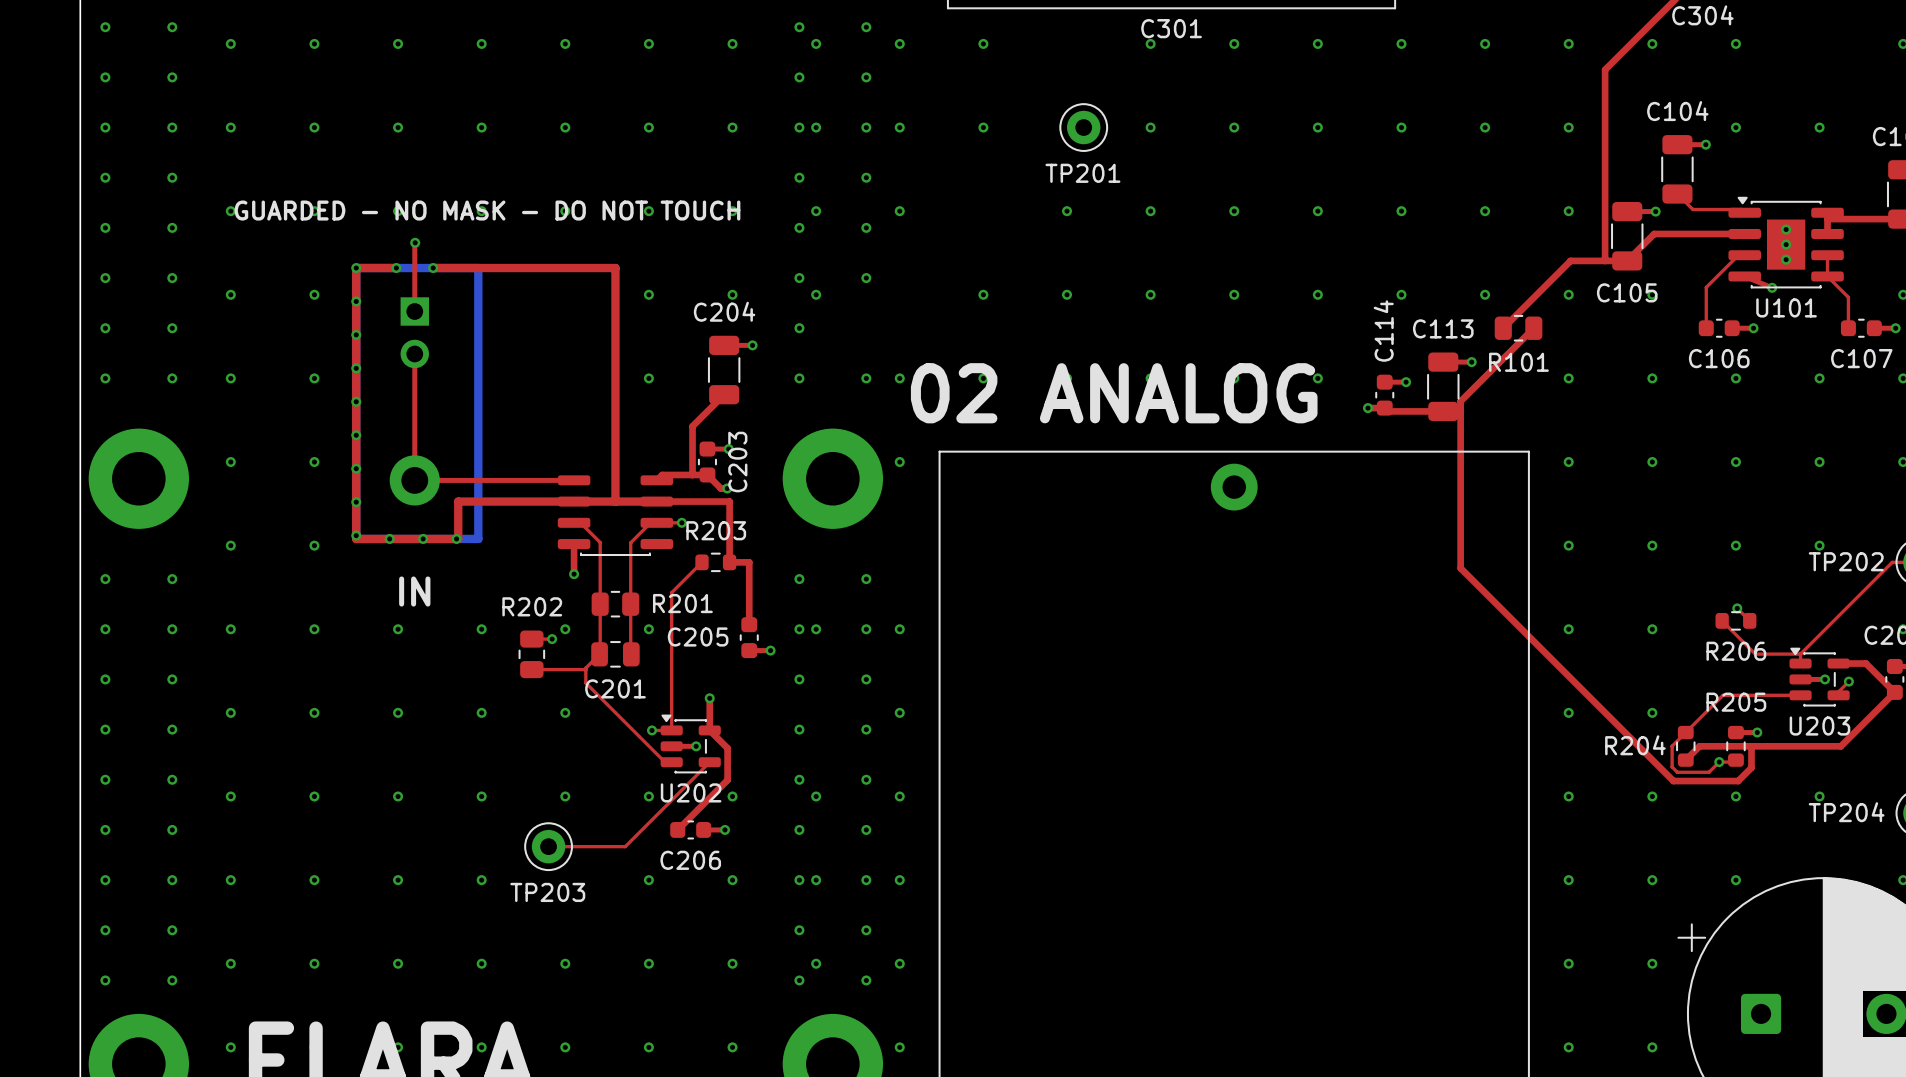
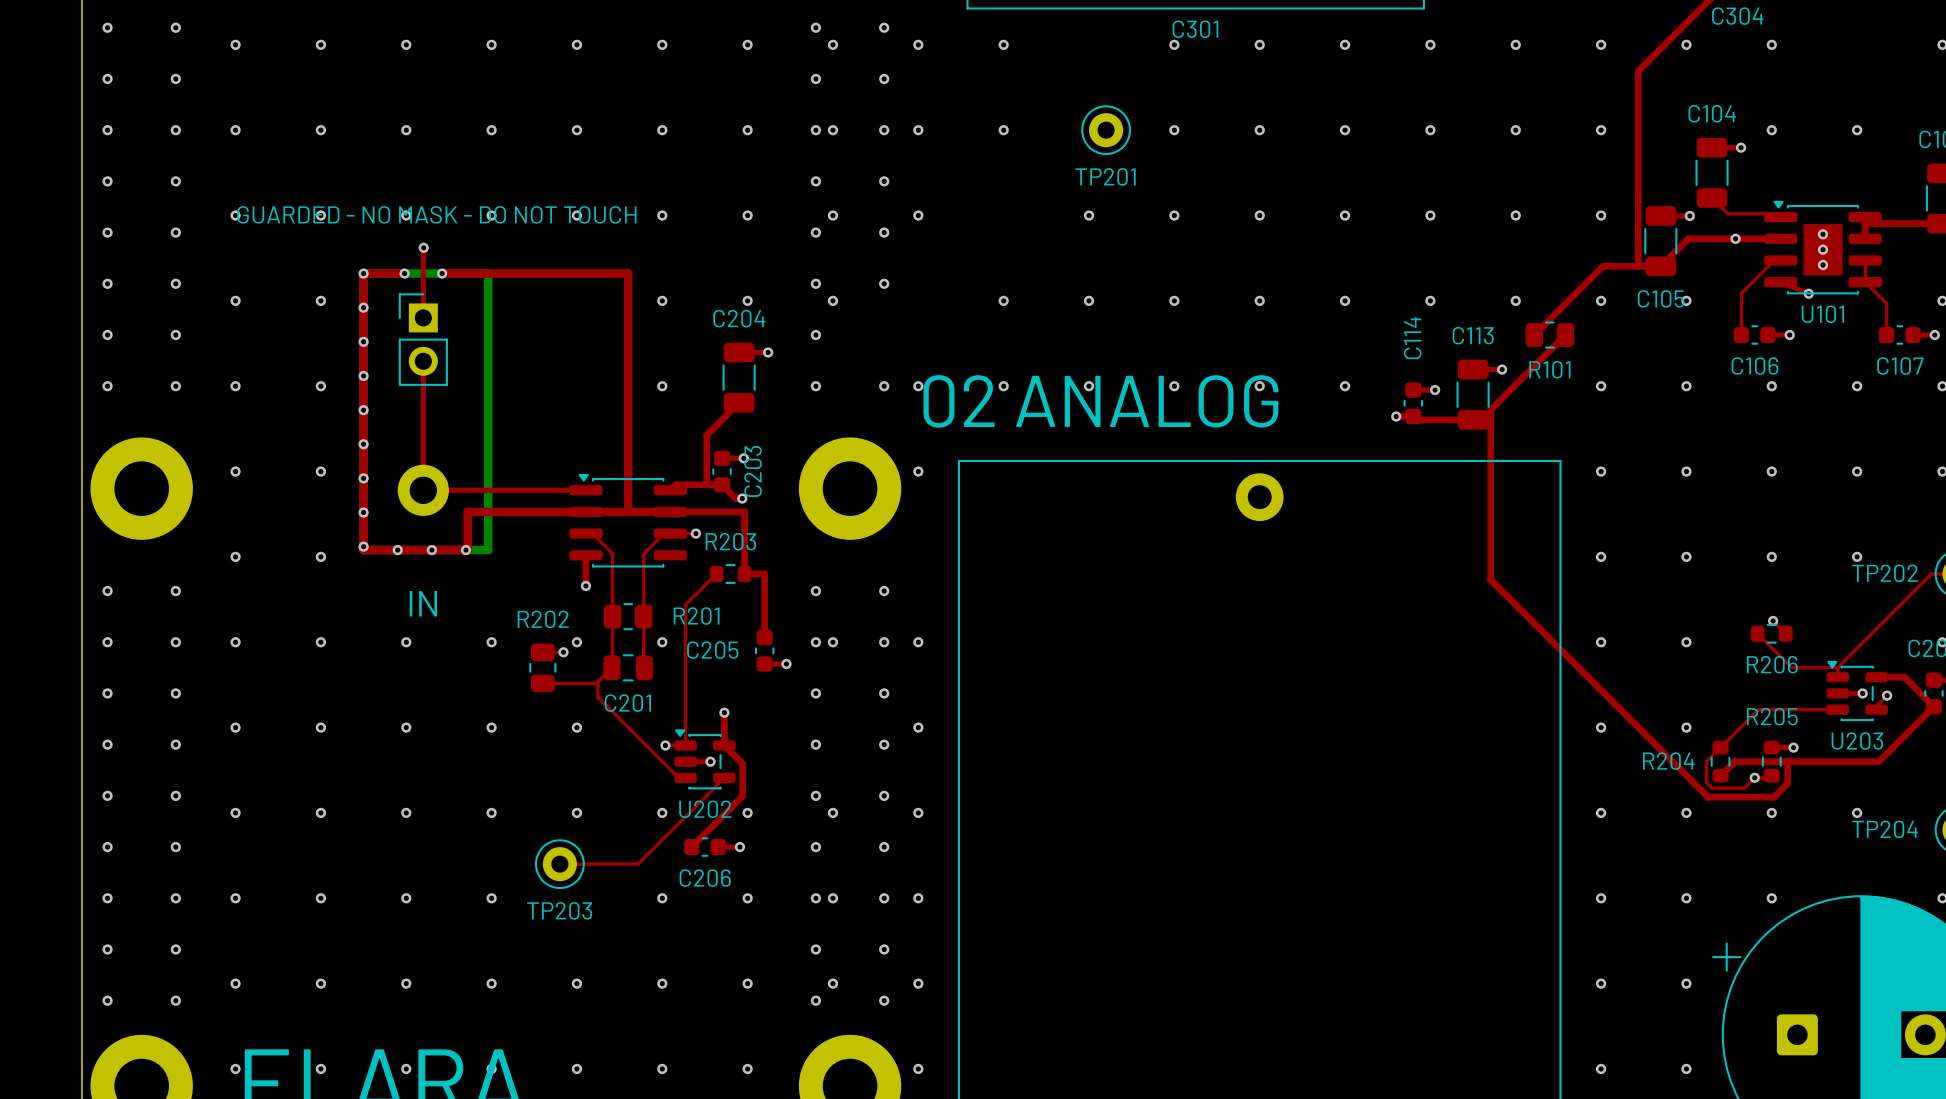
via: none -> (1735, 238)
part footprint: [400, 297, 429, 369] -> [398, 293, 448, 386]
part footprint: [557, 475, 674, 557] -> [569, 473, 688, 568]

